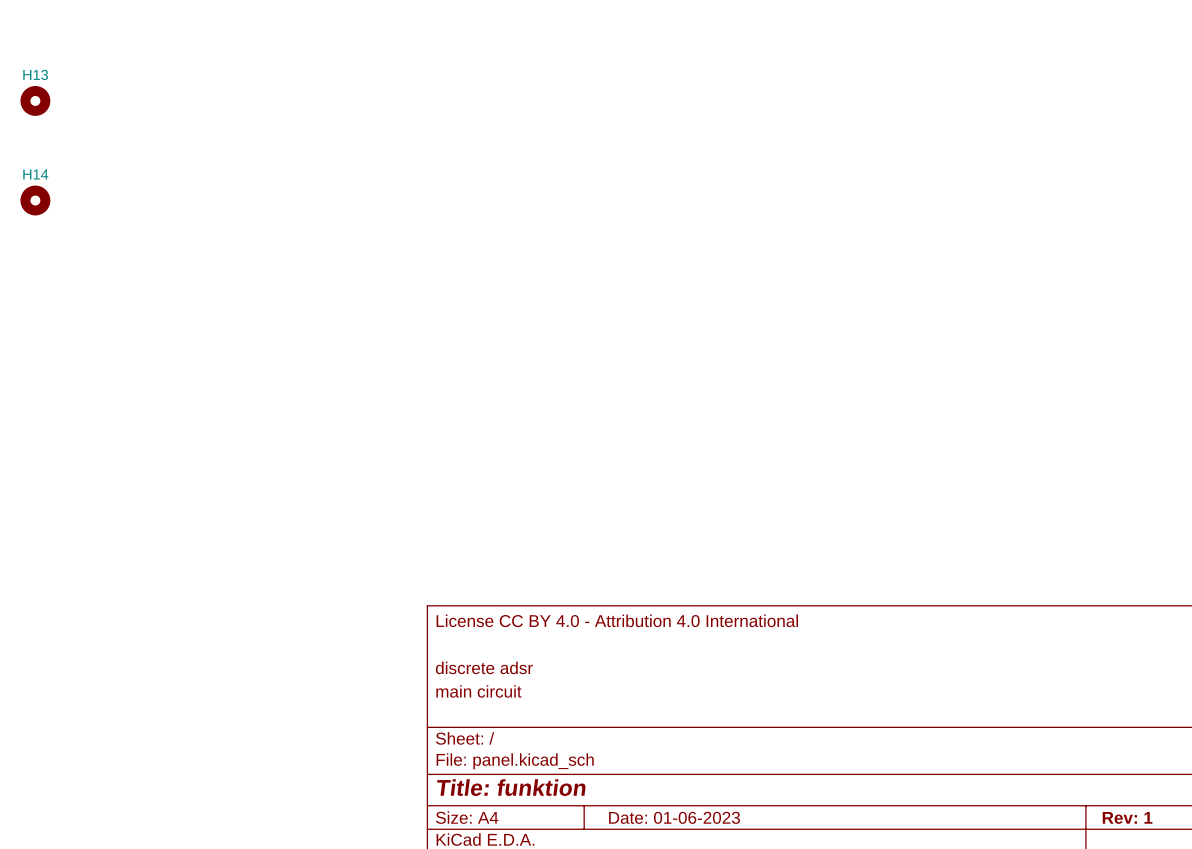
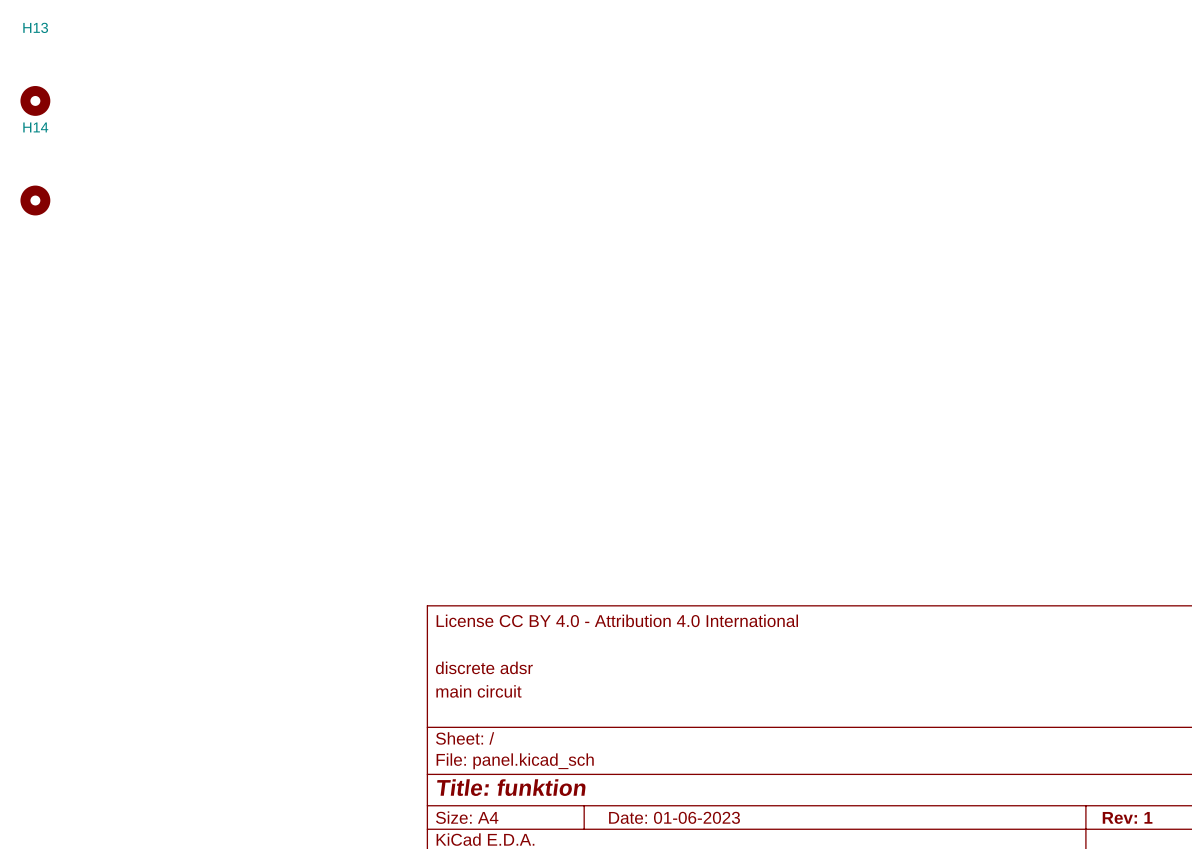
H13 name position: H13 (35, 74) -> H13 (35, 27)
H14 name position: H14 (35, 174) -> H14 (35, 127)

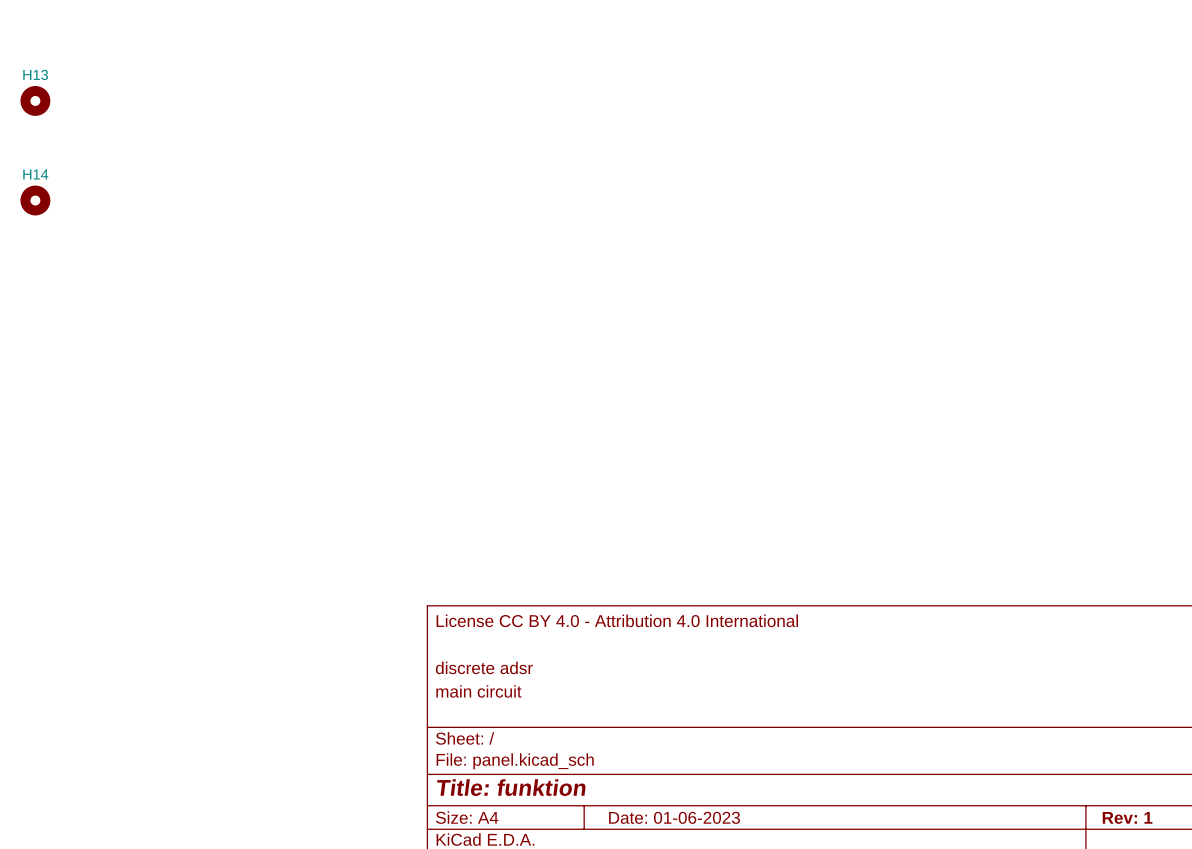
H13 name position: H13 (35, 27) -> H13 (35, 74)
H14 name position: H14 (35, 127) -> H14 (35, 174)

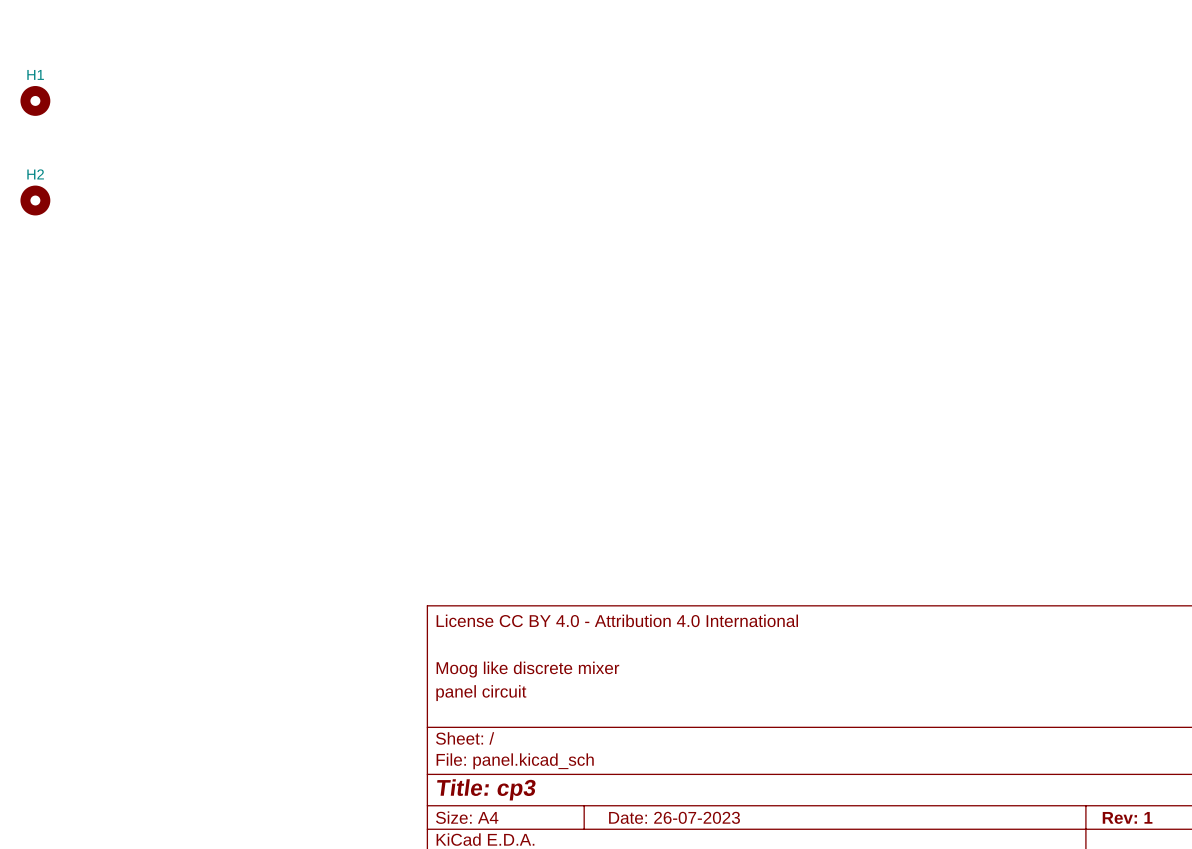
H13 name: H13 (35, 74) -> H1 (35, 74)
H14 name: H14 (35, 174) -> H2 (35, 174)
title block: discrete adsr (484, 667) -> Moog like discrete mixer (527, 669)
title block: main circuit (478, 691) -> panel circuit (481, 693)
title block: Title: funktion (511, 787) -> Title: cp3 (486, 789)
title block: Date: 01-06-2023 (674, 817) -> Date: 26-07-2023 (674, 817)

